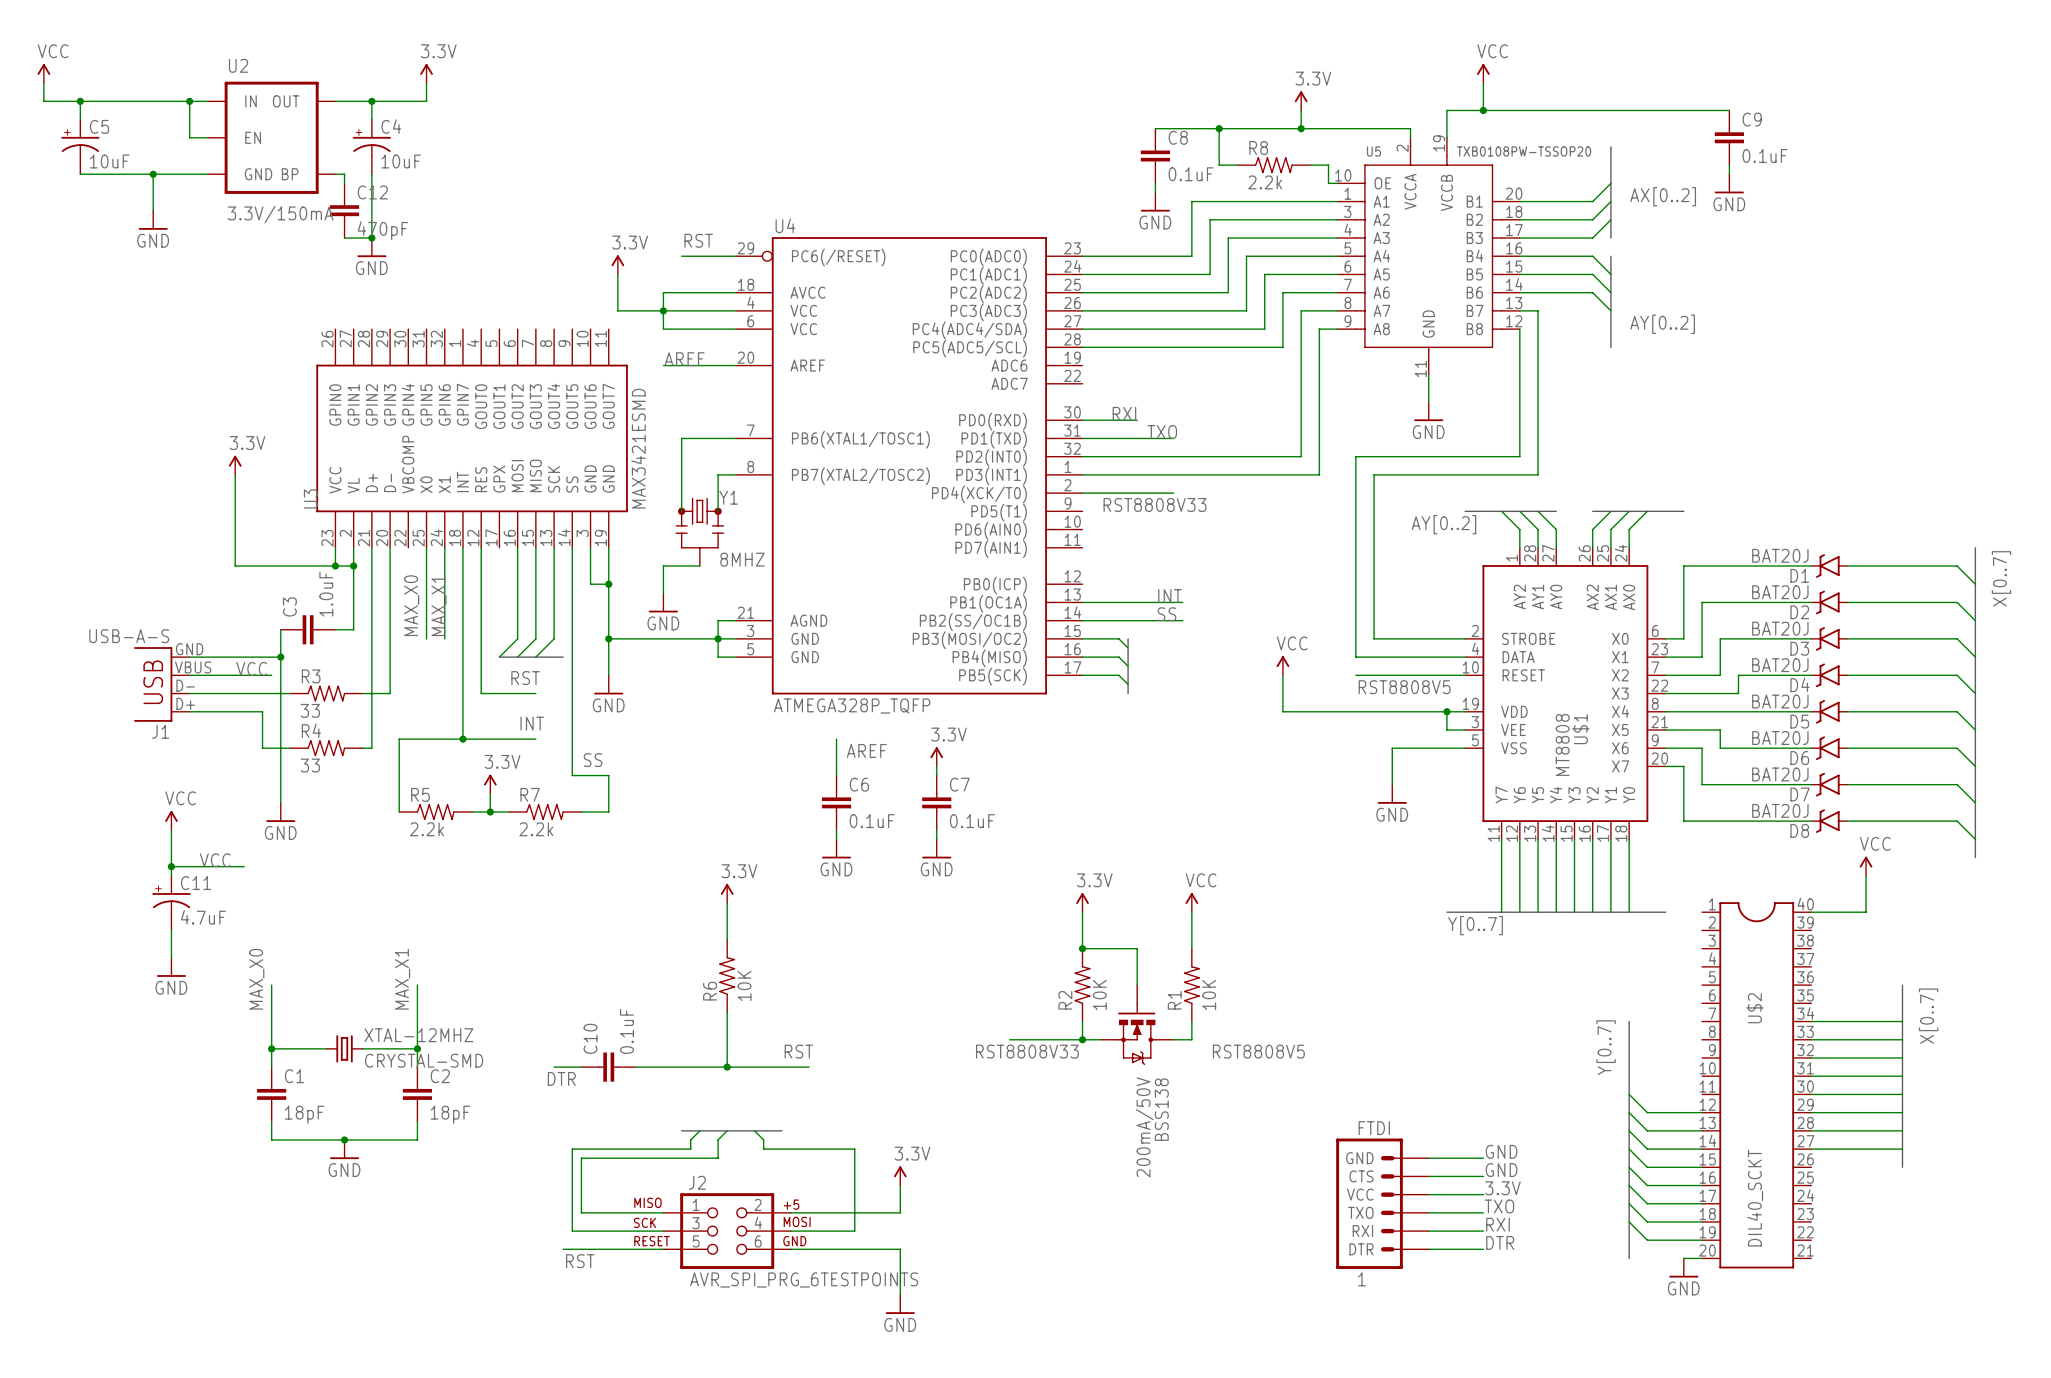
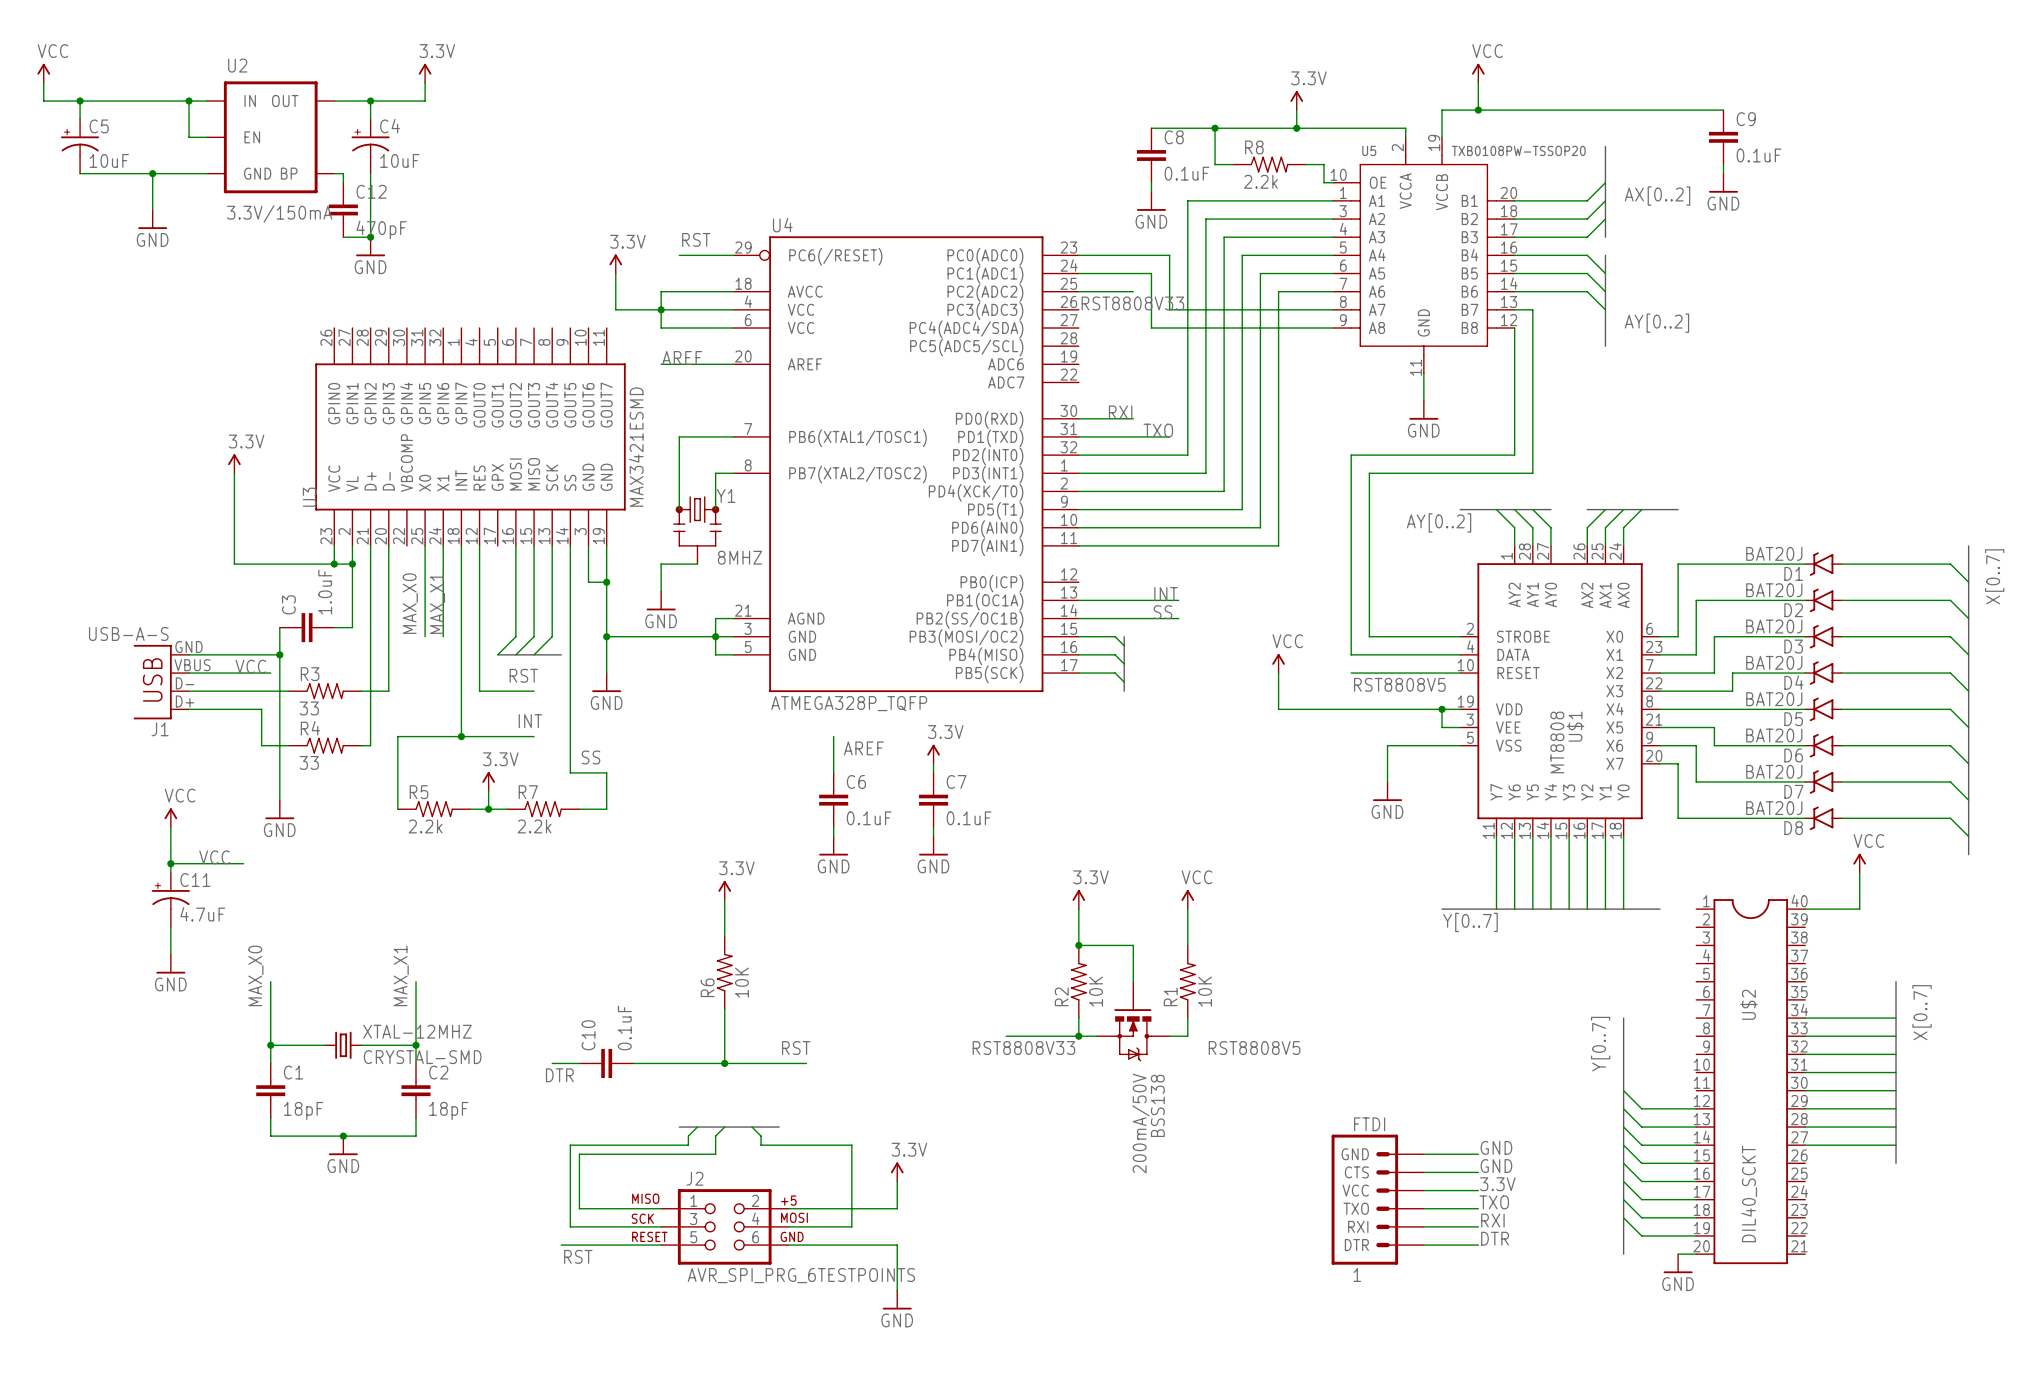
wire: (1173, 256) (1191, 256) -> (1169, 255) (1169, 309)
wire: none -> (1187, 255) (1187, 455)
wire: (1155, 274) (1210, 274) -> (1151, 273) (1151, 328)
wire: (1137, 292) (1228, 292) -> (1169, 491) (1224, 491) (1224, 291)
label: none -> RST8808V33 (1132, 303)
wire: (1082, 310) (1173, 310) -> none
wire: (1301, 310) (1301, 456) (1191, 456) -> (1296, 309) (1242, 309) (1242, 509) (1078, 509)
wire: (1082, 329) (1155, 329) -> none
wire: (1319, 329) (1319, 474) (1210, 474) -> (1205, 273) (1205, 473)
wire: none -> (1314, 328) (1260, 328) (1260, 527) (1078, 527)
wire: (1082, 347) (1282, 347) -> (1078, 545) (1278, 545) (1278, 346)
label: RST8808V33 (1154, 504) -> none

